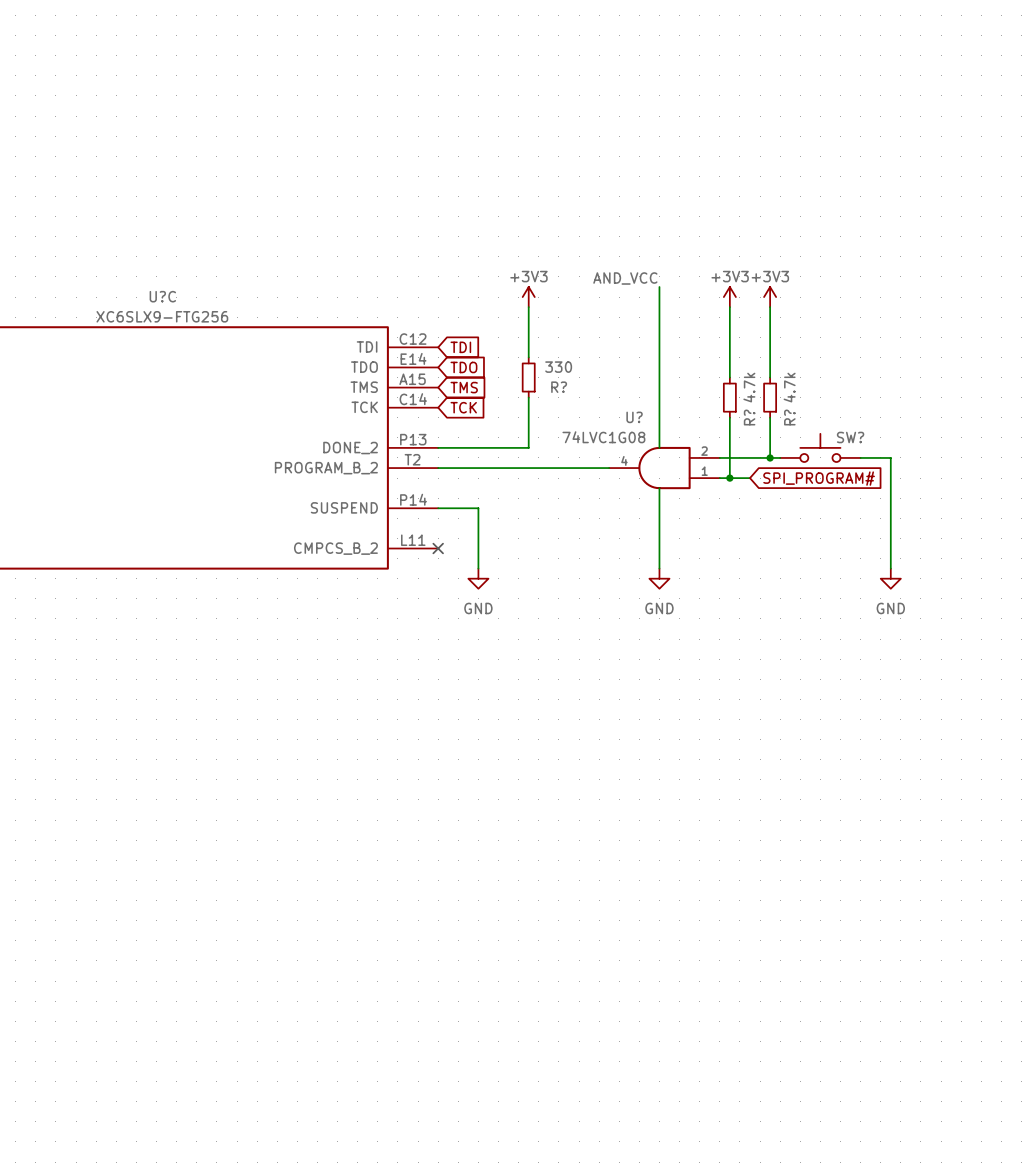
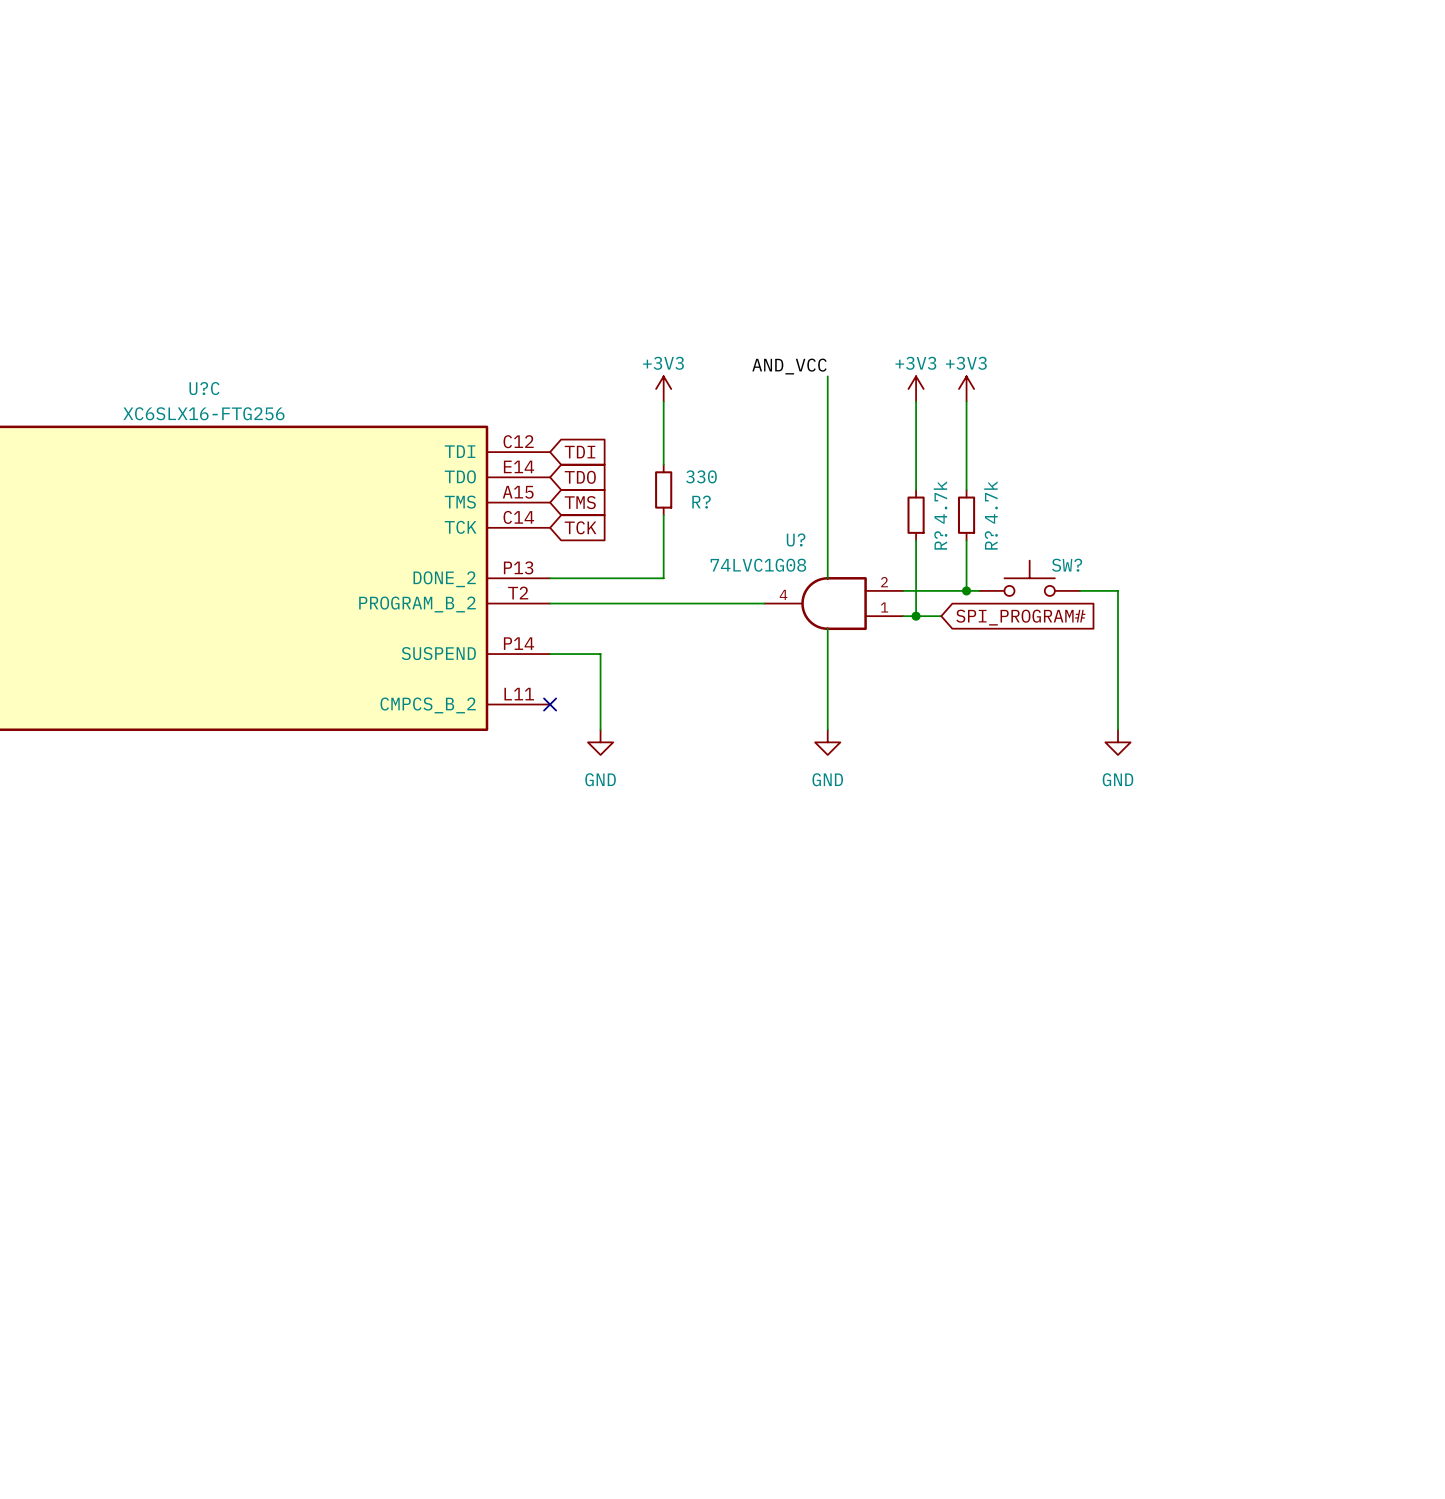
U?C value: XC6SLX9-FTG256 (162, 316) -> XC6SLX16-FTG256 (203, 413)

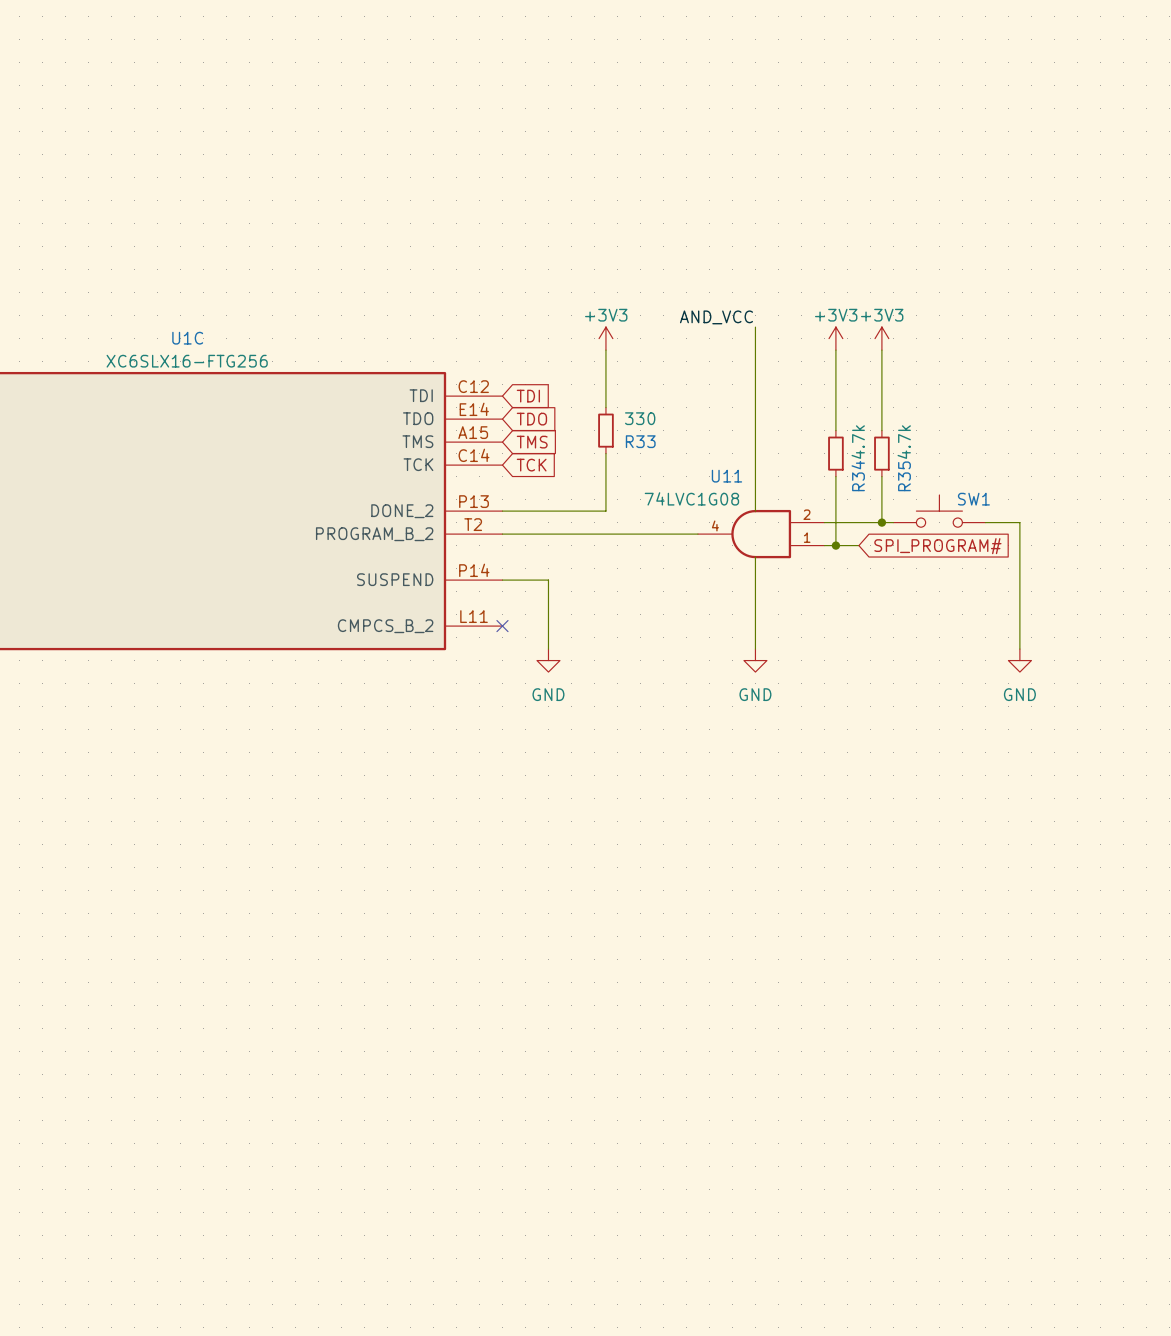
U?C name: U?C (204, 388) -> U1C (187, 338)
R? name: R? (701, 502) -> R33 (640, 441)
U? name: U? (796, 539) -> U11 (726, 476)
R? name: R? (940, 540) -> R34 (858, 476)
R? name: R? (991, 540) -> R35 (904, 476)
SW? name: SW? (1067, 565) -> SW1 (973, 499)

